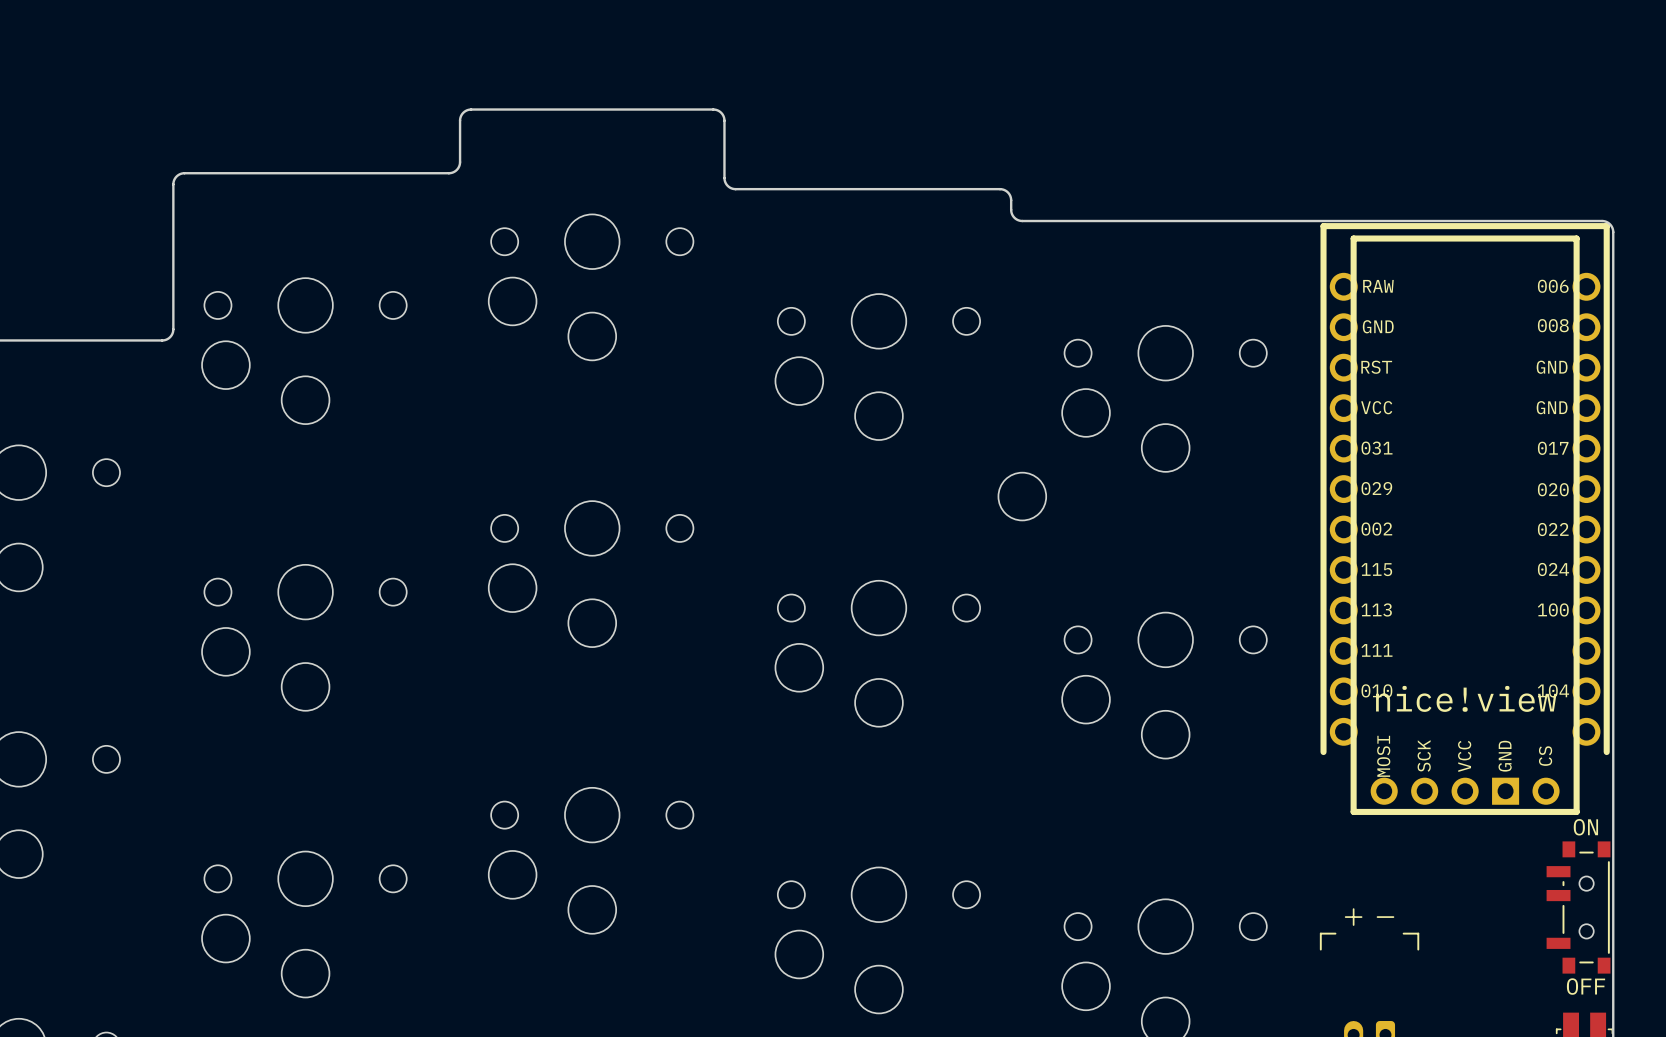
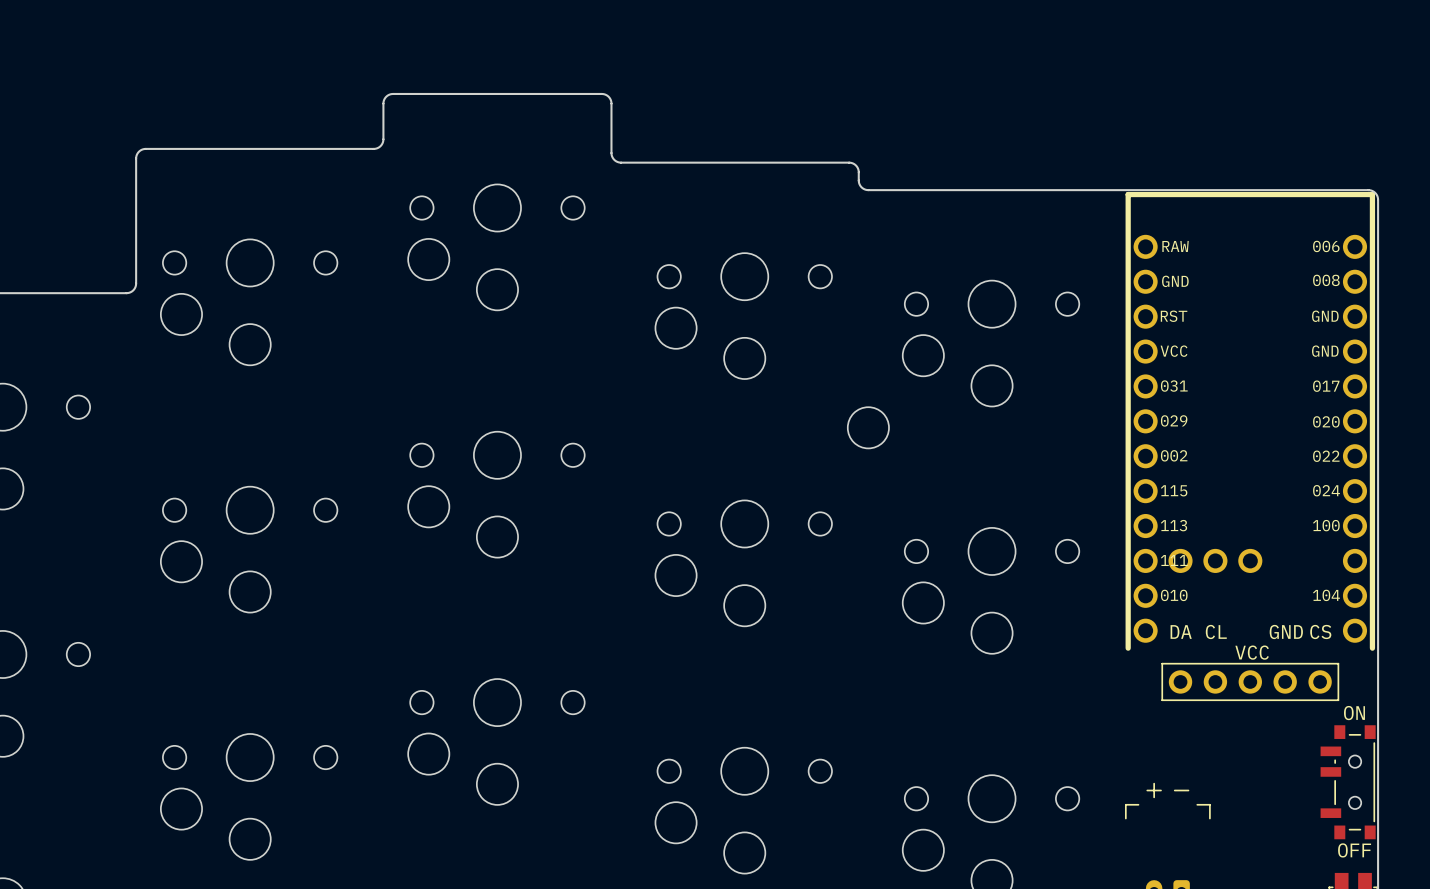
part footprint: [1320, 223, 1610, 756] -> [1125, 191, 1376, 651]
part: (1465, 525) -> none
part: none -> (1250, 681)

